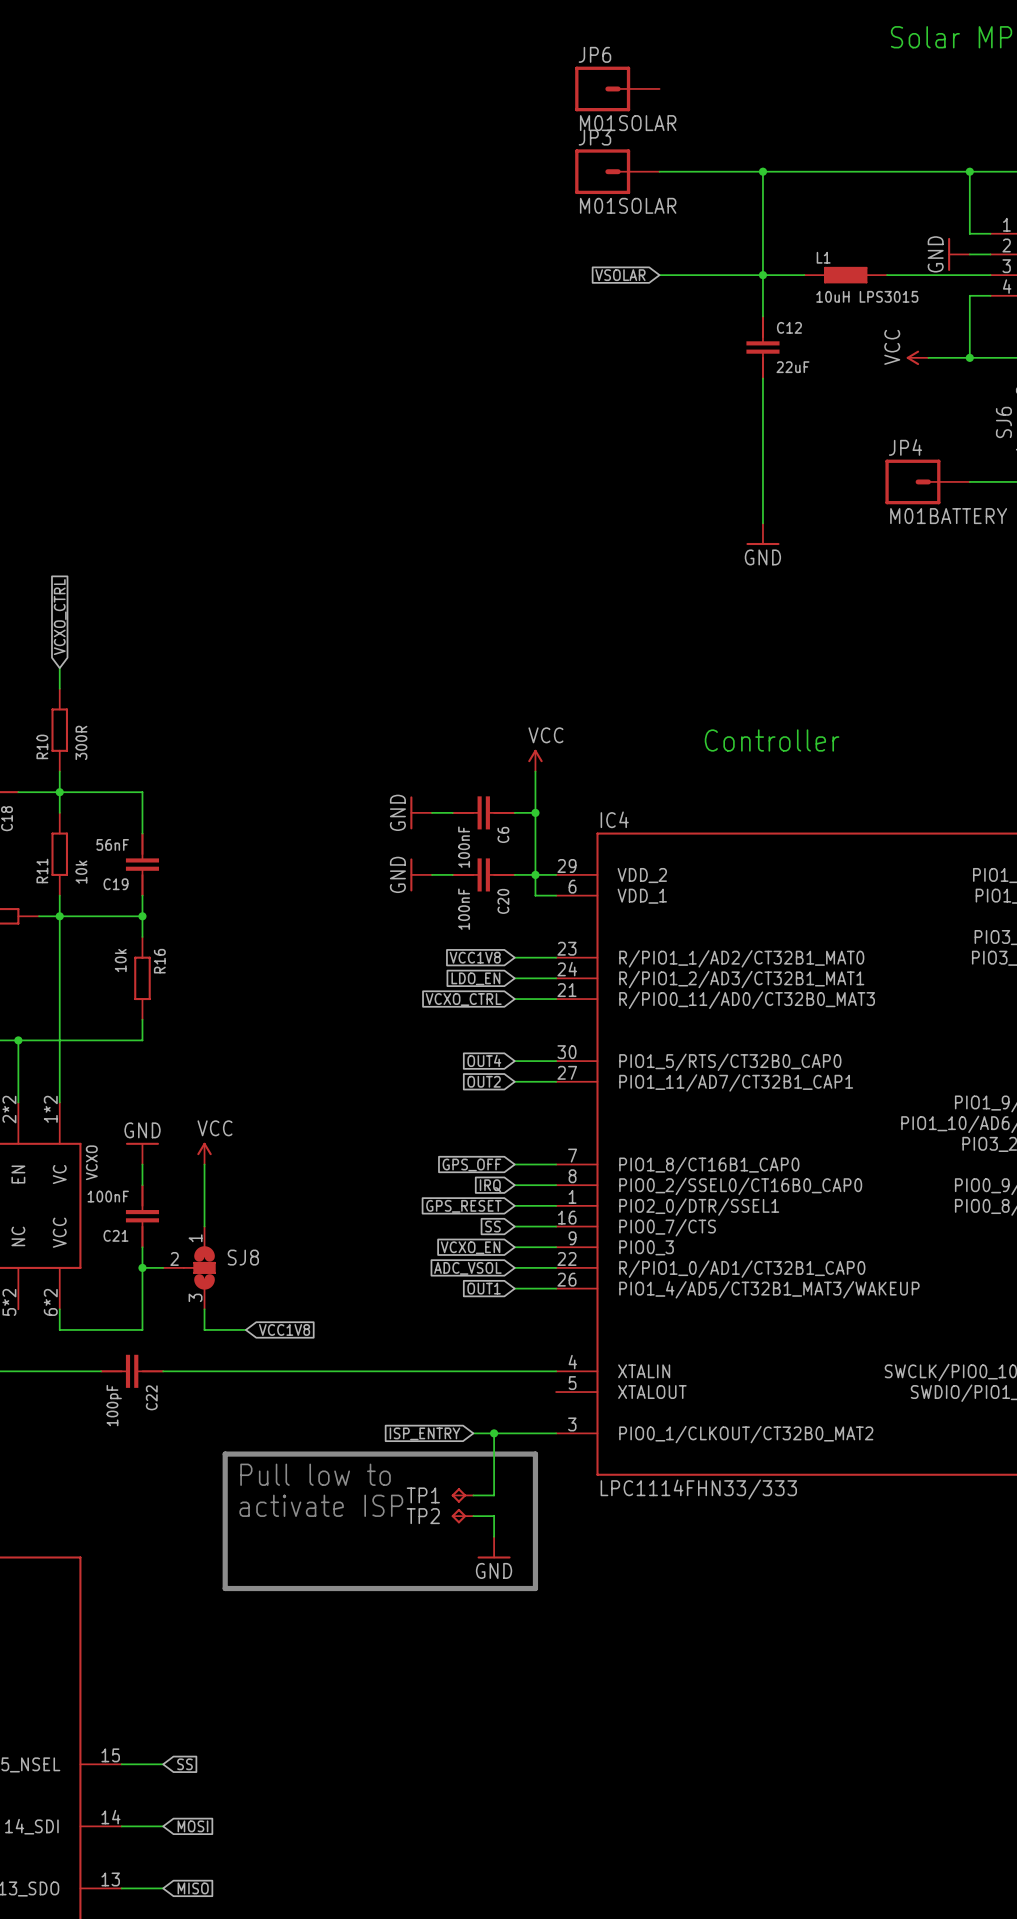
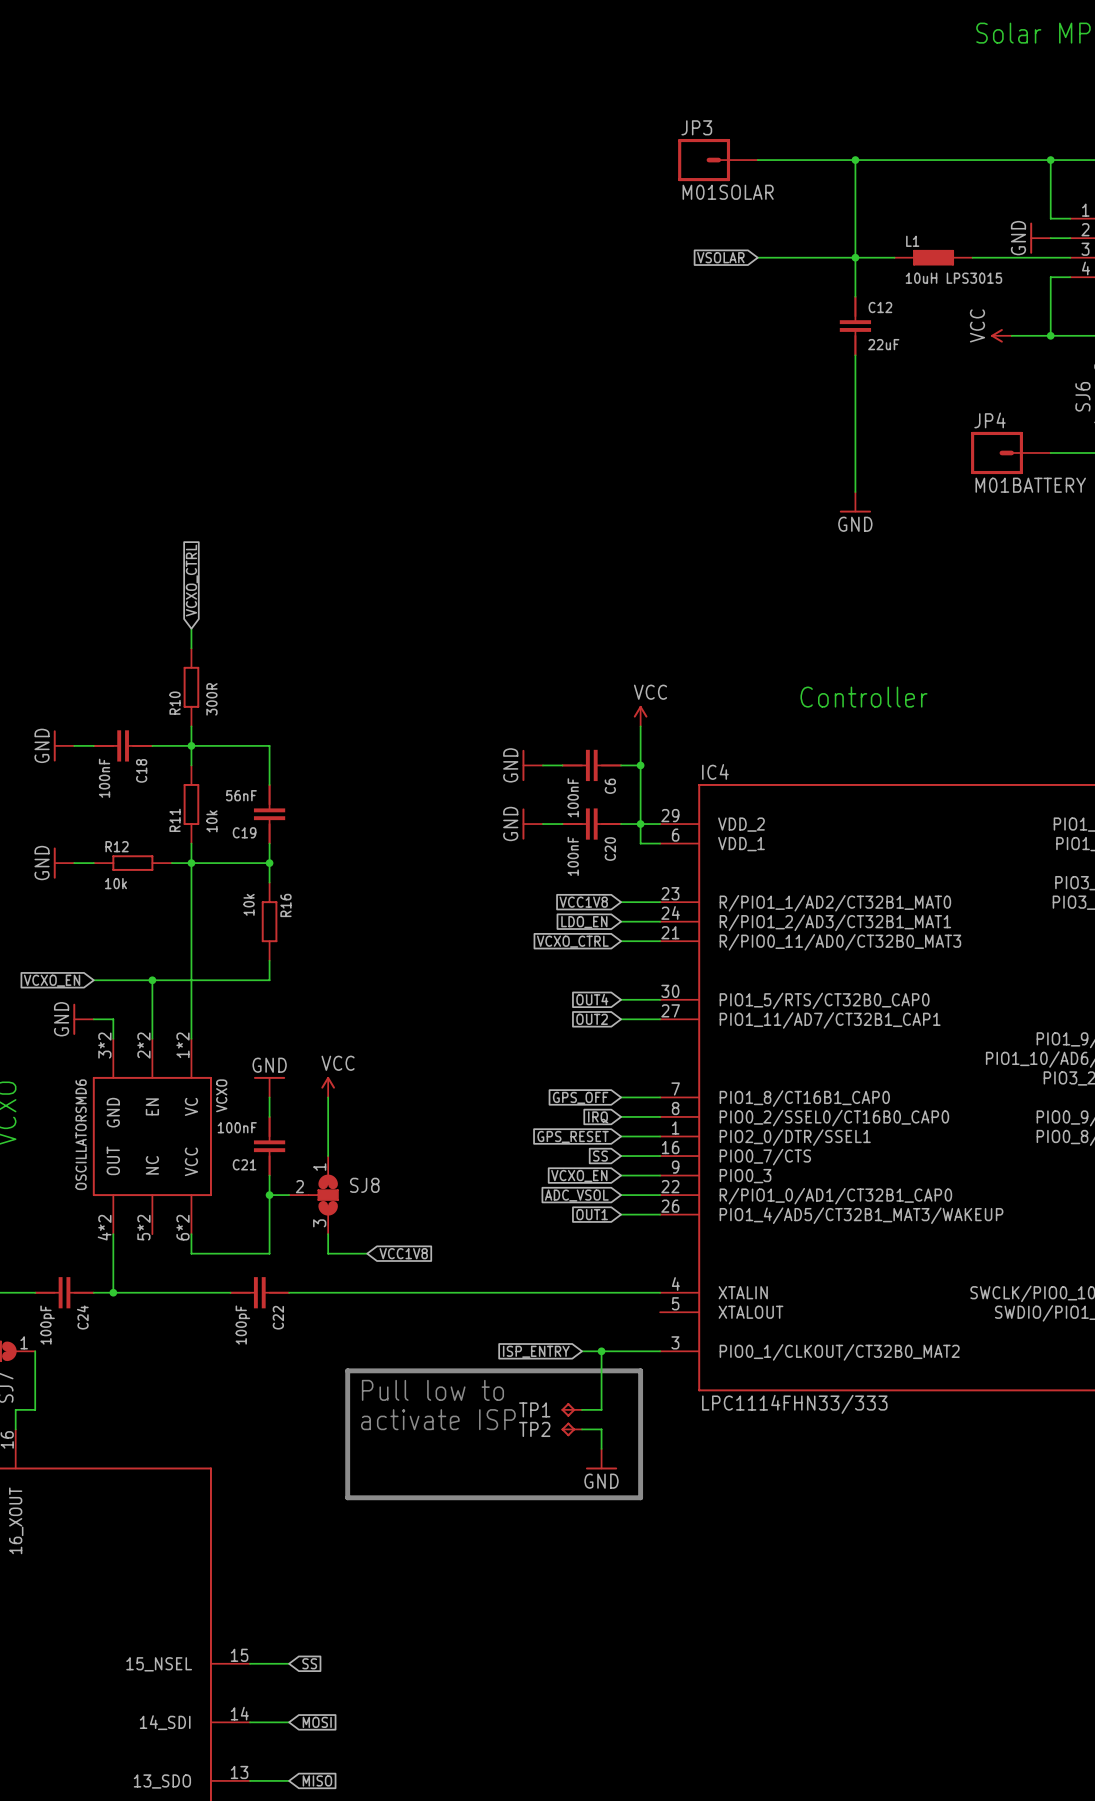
JP6: M01SOLAR (617, 88) -> none

